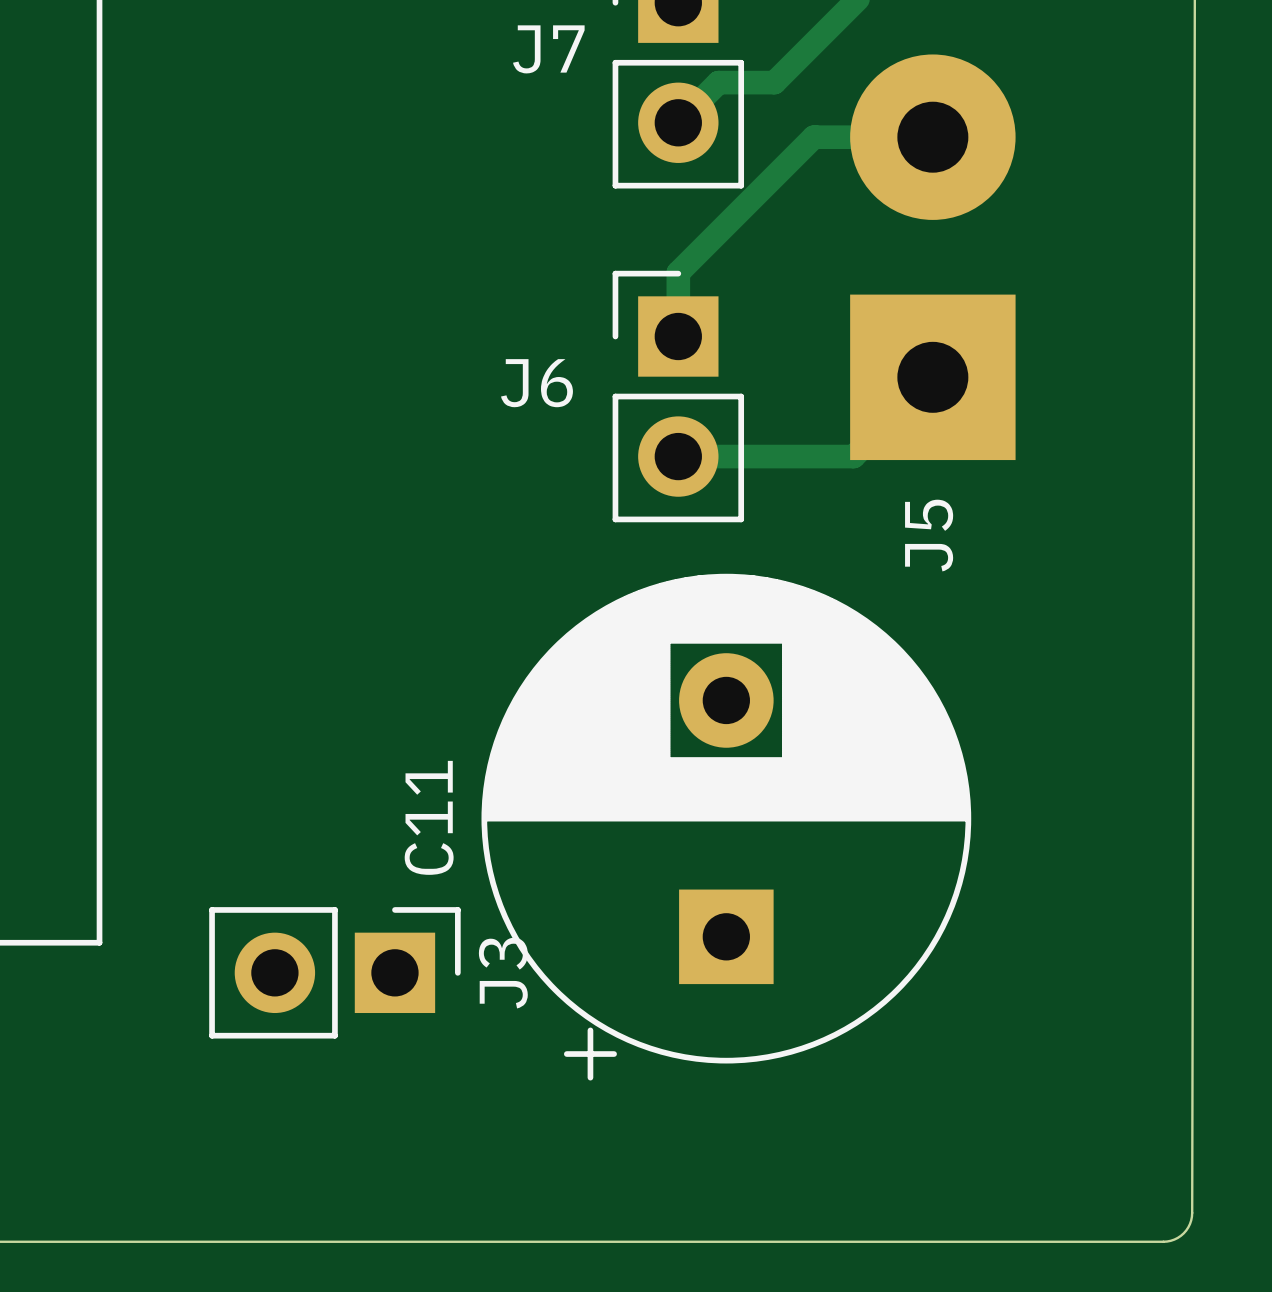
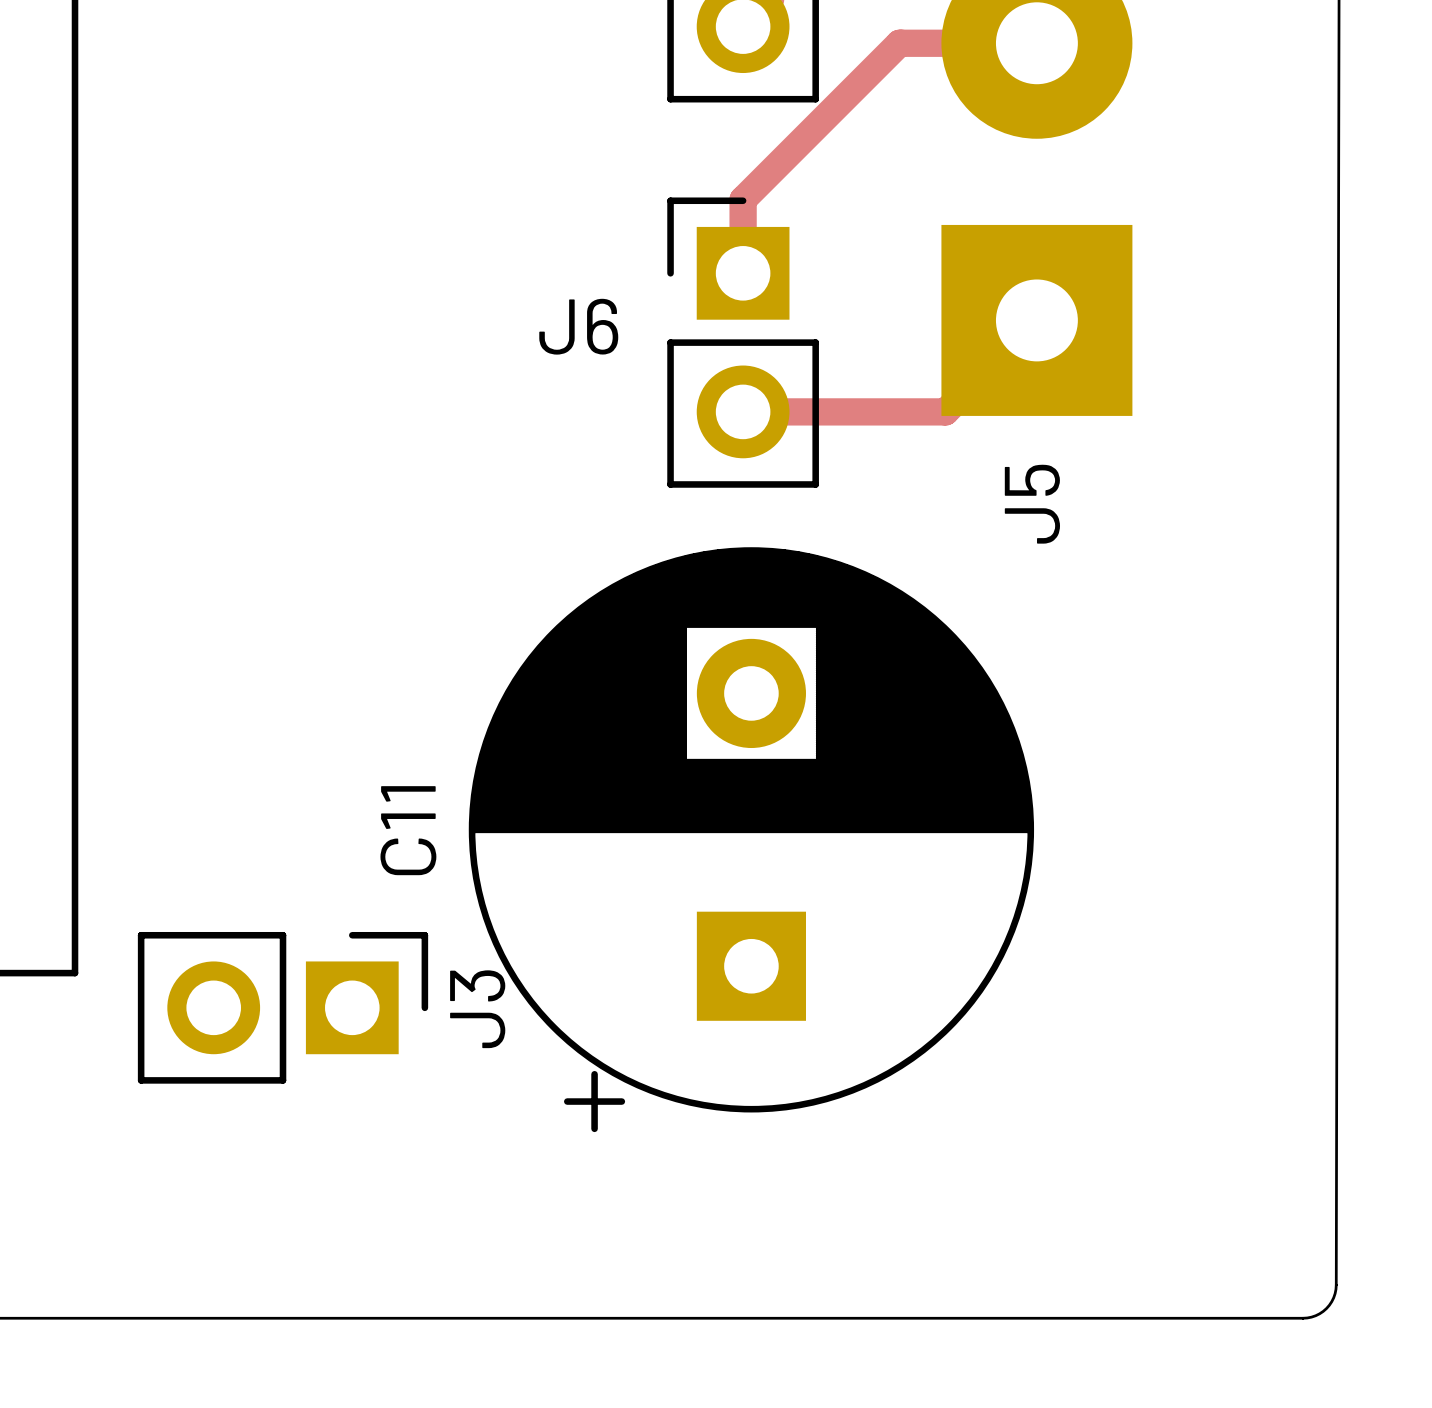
C11 position: (726, 827) -> (751, 839)
J3 position: (334, 972) -> (283, 1007)

